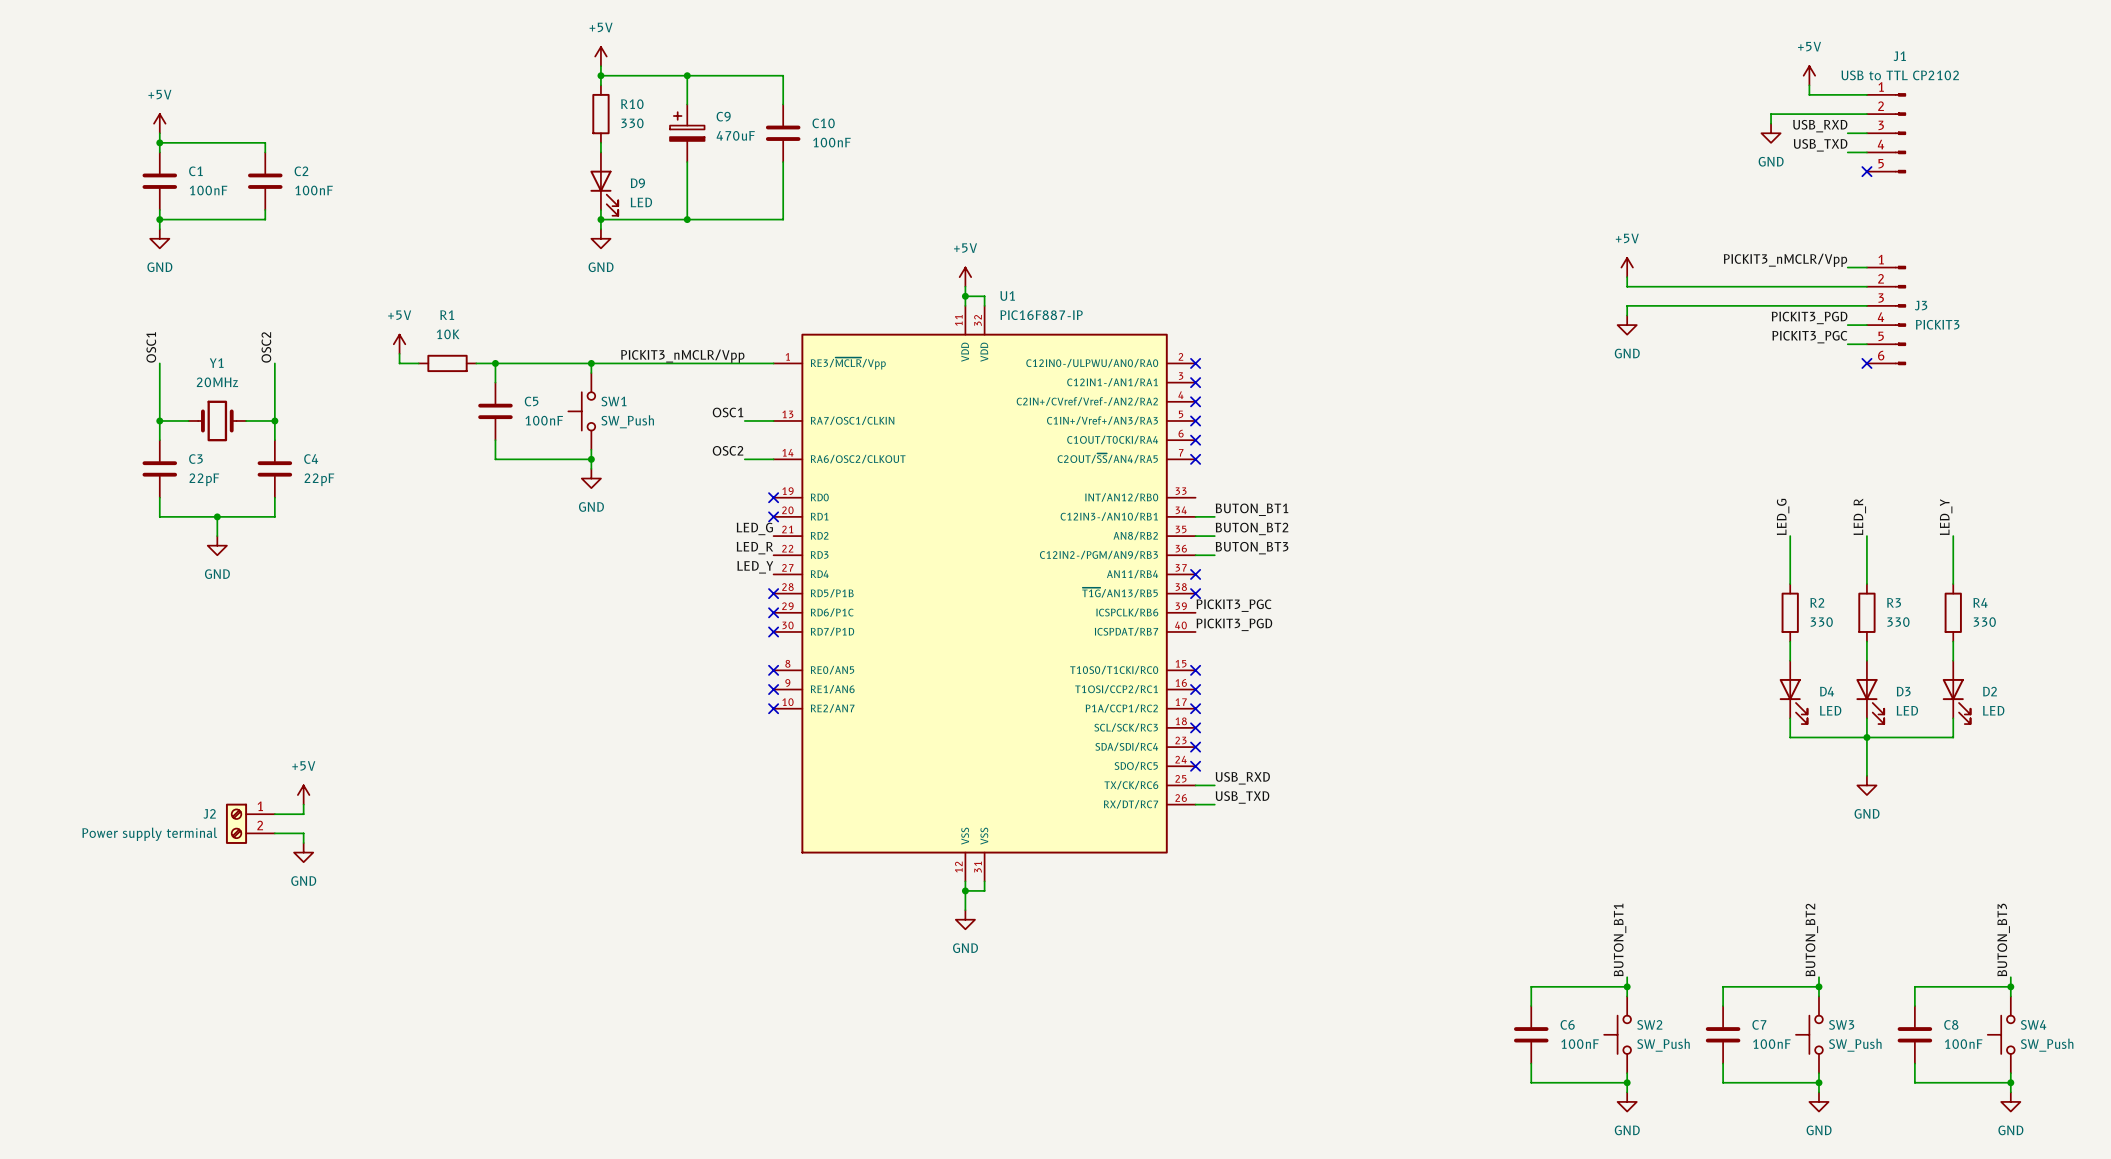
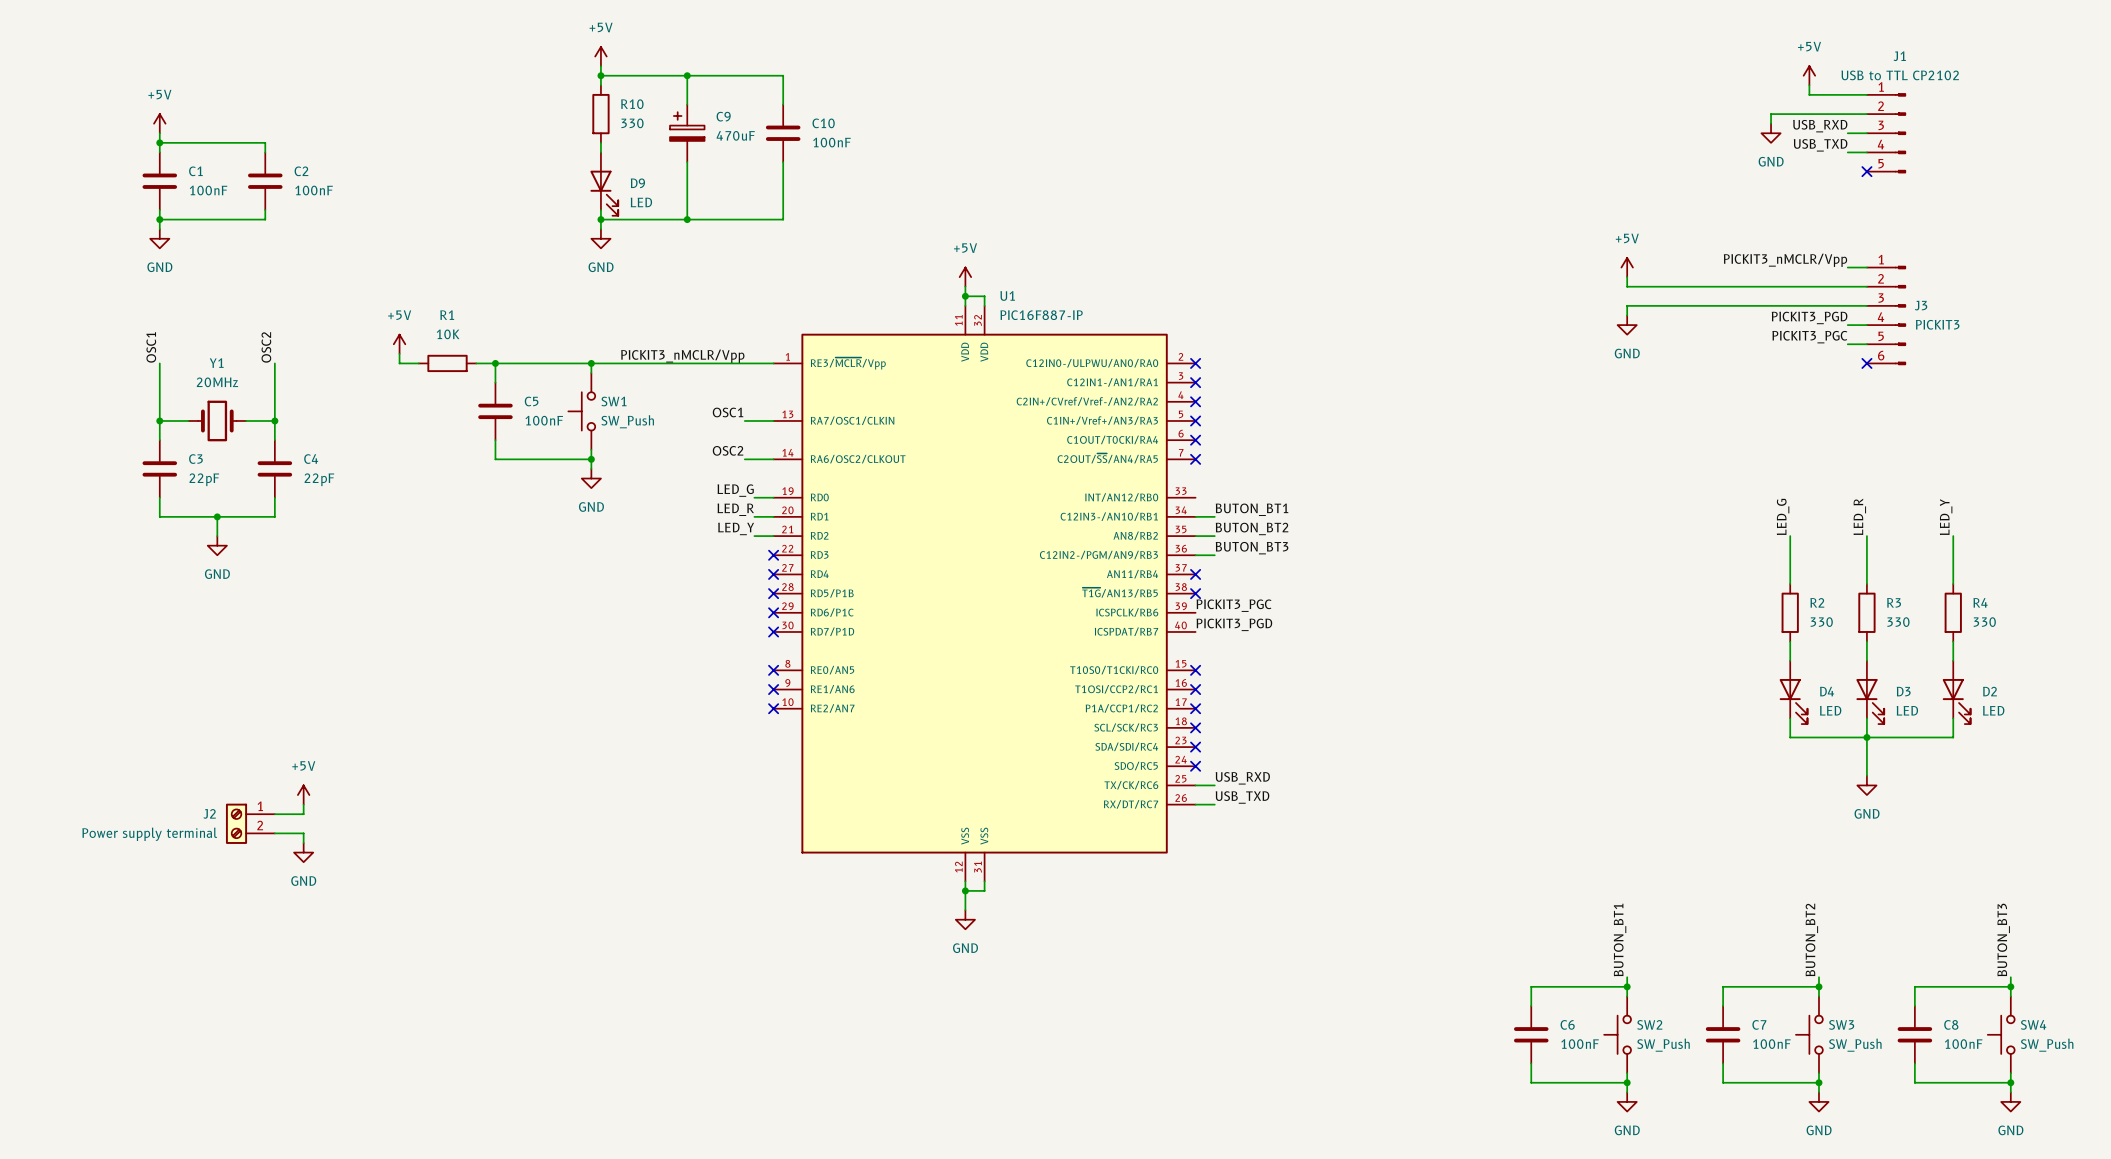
wire: none -> (754, 497) (773, 497)
no-connect mark: (773, 497) -> none
wire: none -> (754, 516) (773, 516)
no-connect mark: (773, 516) -> none
label position: LED_G (754, 528) -> LED_G (735, 490)
wire: none -> (754, 536) (773, 536)
label position: LED_R (754, 548) -> LED_R (735, 509)
no-connect mark: none -> (773, 555)
label position: LED_Y (755, 567) -> LED_Y (736, 528)
no-connect mark: none -> (773, 574)

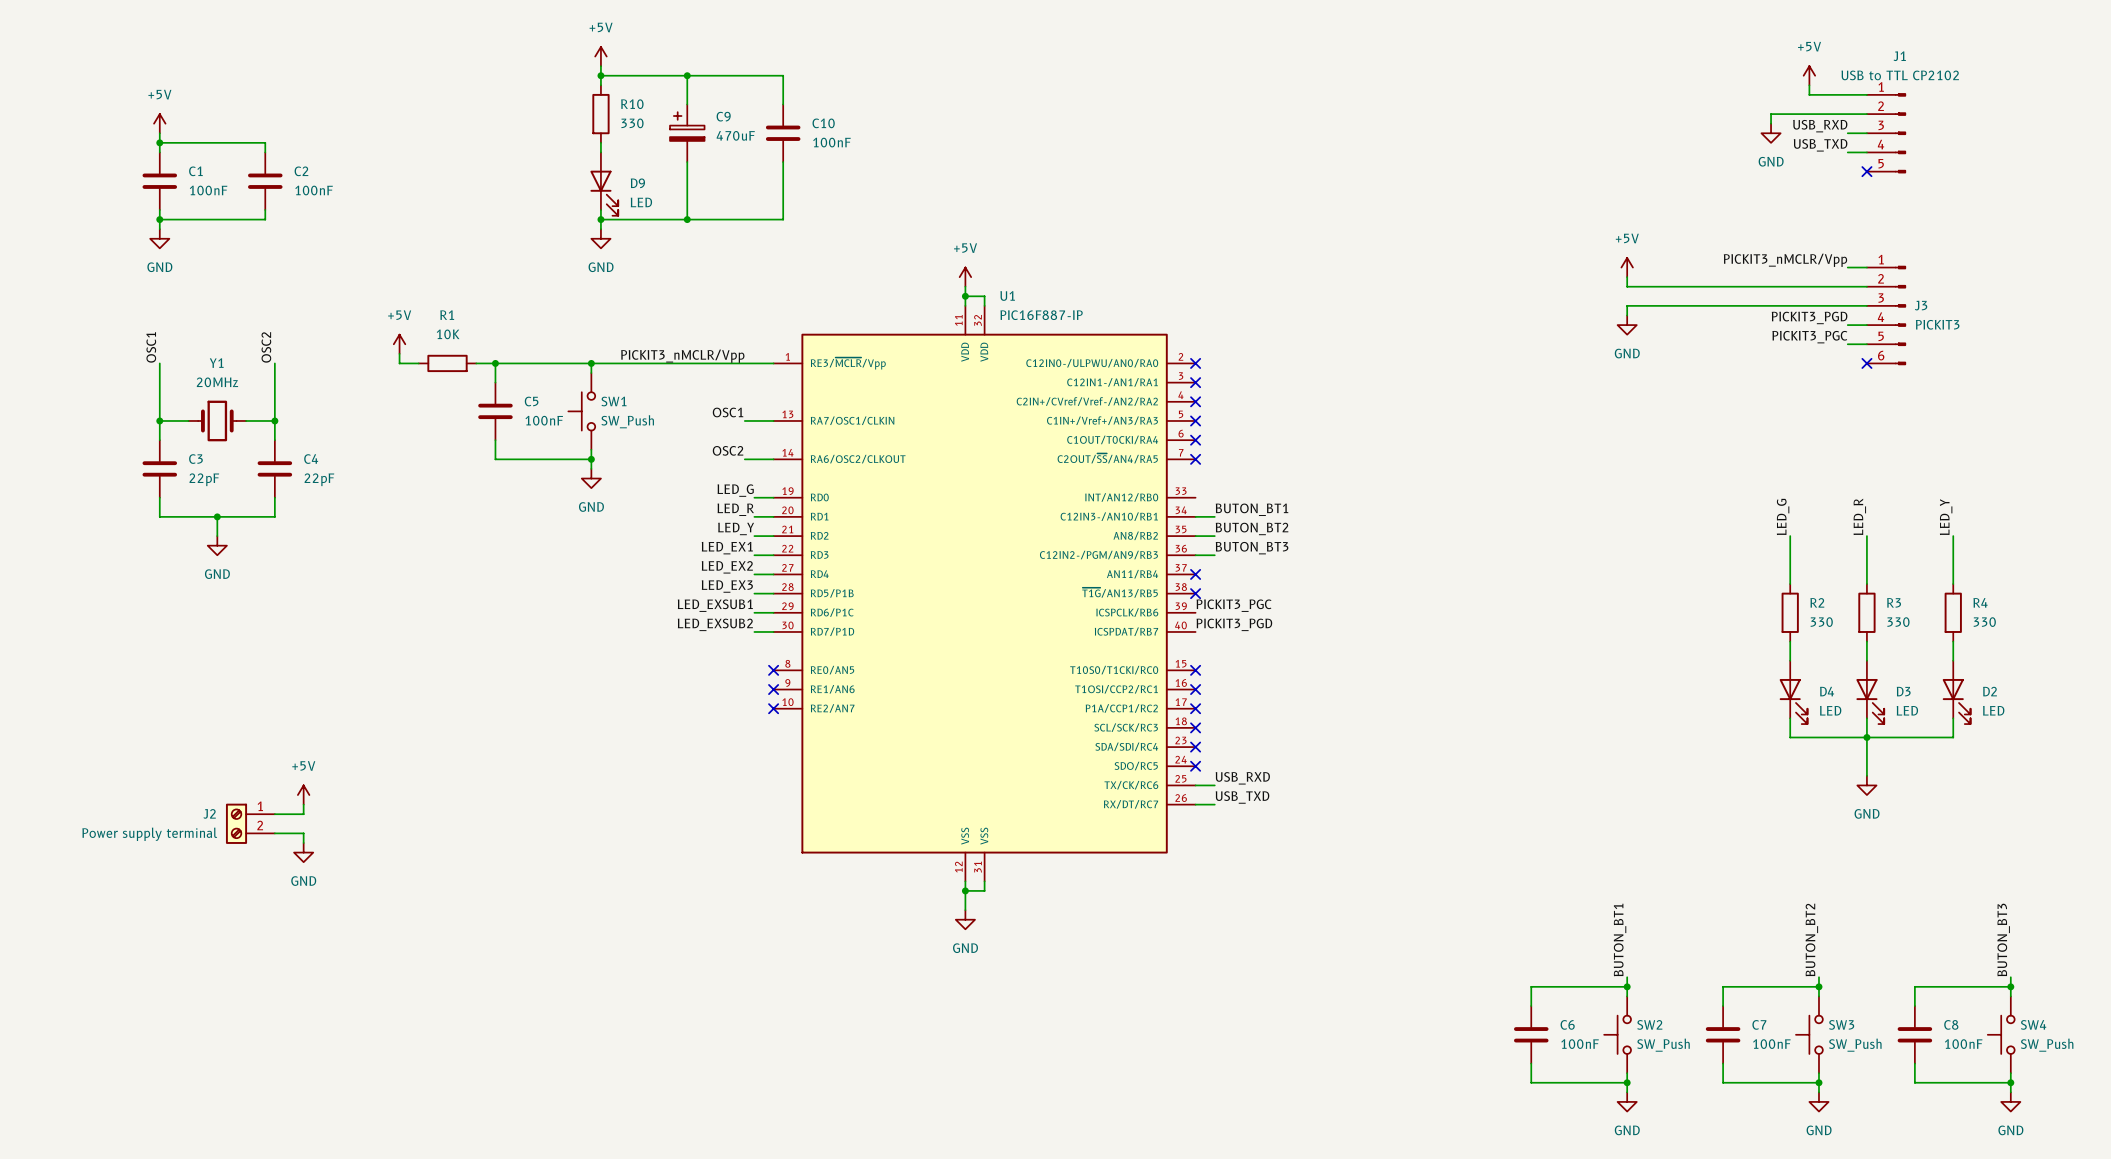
label: none -> LED_EX1 (727, 548)
wire: none -> (754, 555) (773, 555)
no-connect mark: (773, 555) -> none
label: none -> LED_EX2 (727, 567)
wire: none -> (754, 574) (773, 574)
no-connect mark: (773, 574) -> none
label: none -> LED_EX3 (727, 586)
wire: none -> (754, 593) (773, 593)
no-connect mark: (773, 593) -> none
label: none -> LED_EXSUB1 (715, 605)
wire: none -> (754, 612) (773, 612)
no-connect mark: (773, 612) -> none
label: none -> LED_EXSUB2 (715, 624)
wire: none -> (754, 631) (773, 631)
no-connect mark: (773, 631) -> none

